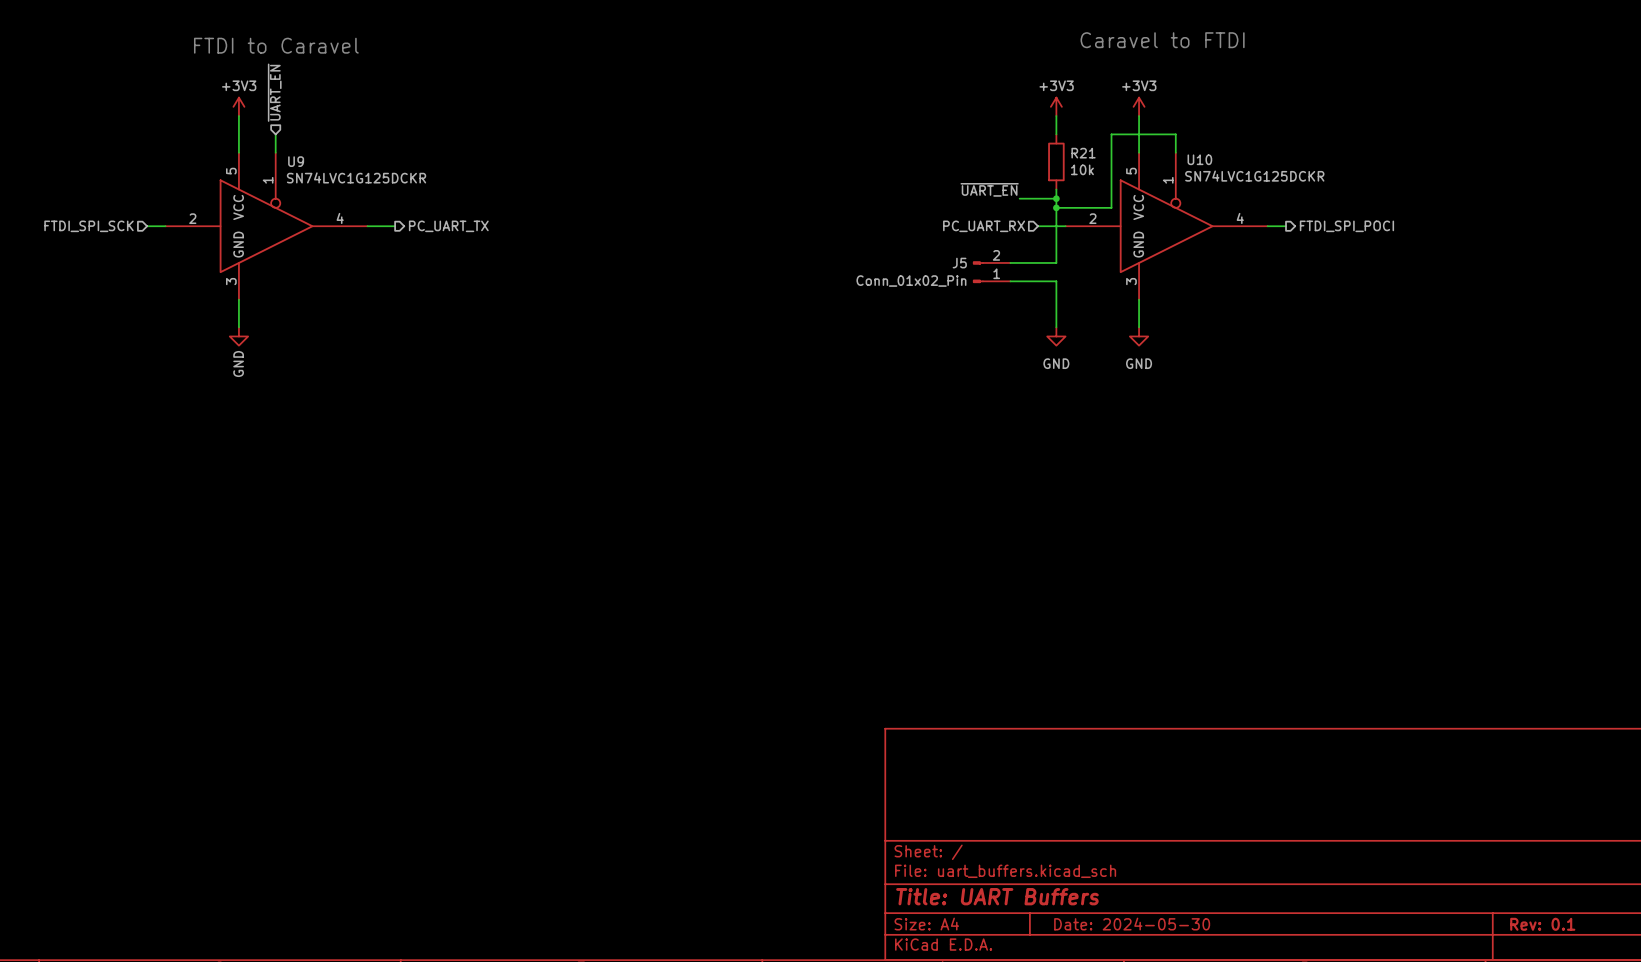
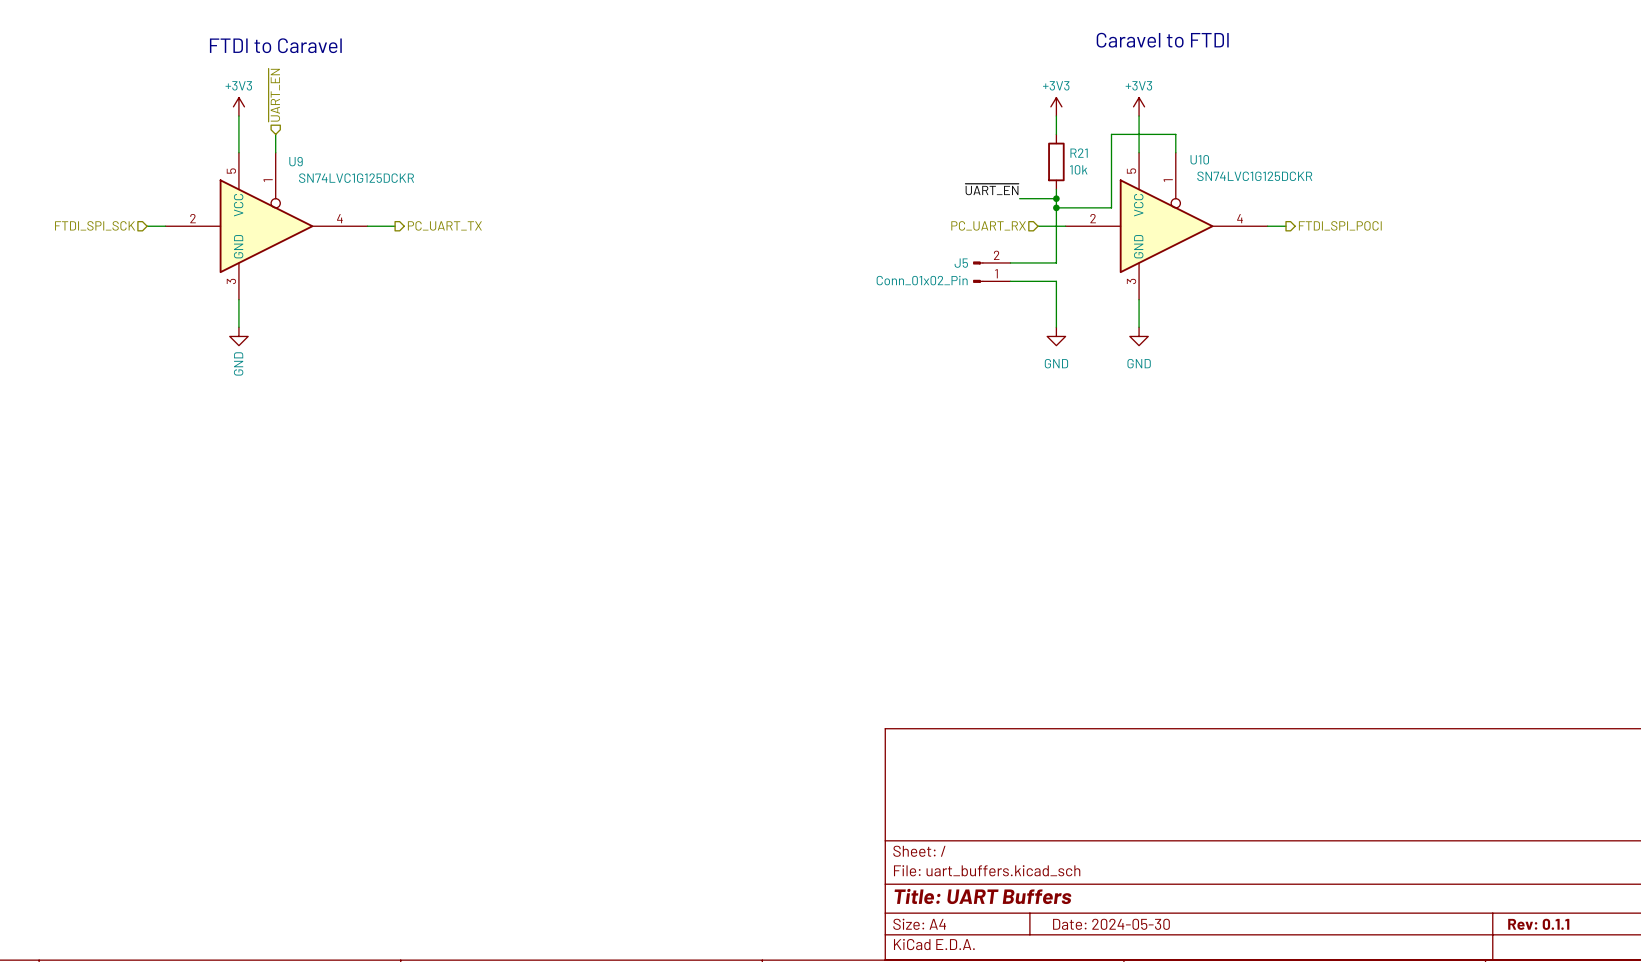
title block: Rev: 0.1 (1542, 924) -> Rev: 0.1.1 (1538, 924)

